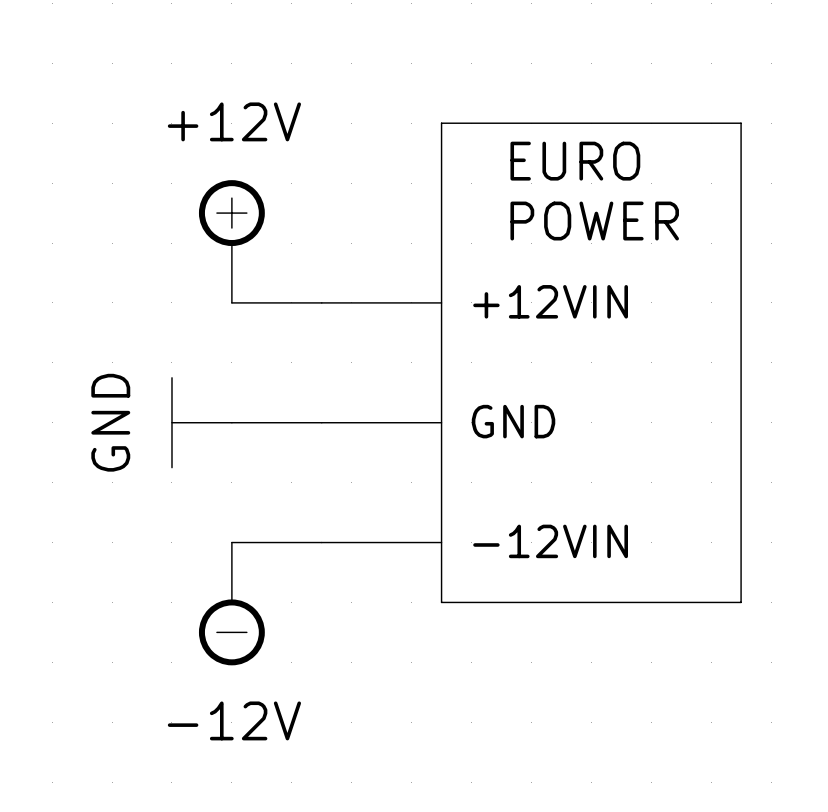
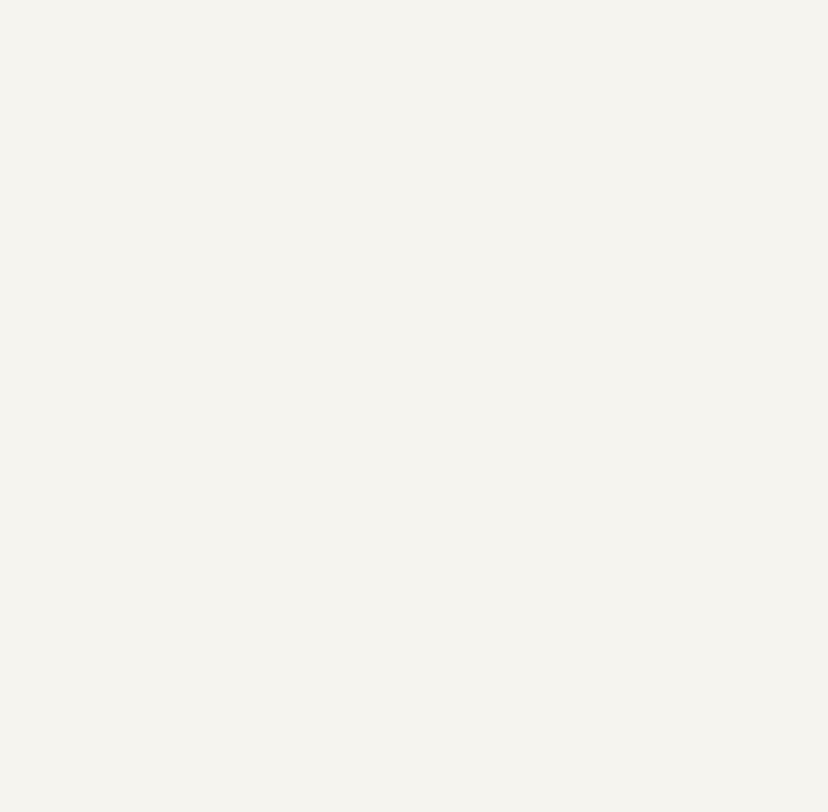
power symbol: +12V (231, 241) -> none
wire: (231, 302) (321, 302) -> none
part: (531, 362) -> none
power symbol: GND (201, 422) -> none
wire: (231, 422) (321, 422) -> none
wire: (231, 542) (321, 542) -> none
power symbol: -12V (231, 603) -> none

